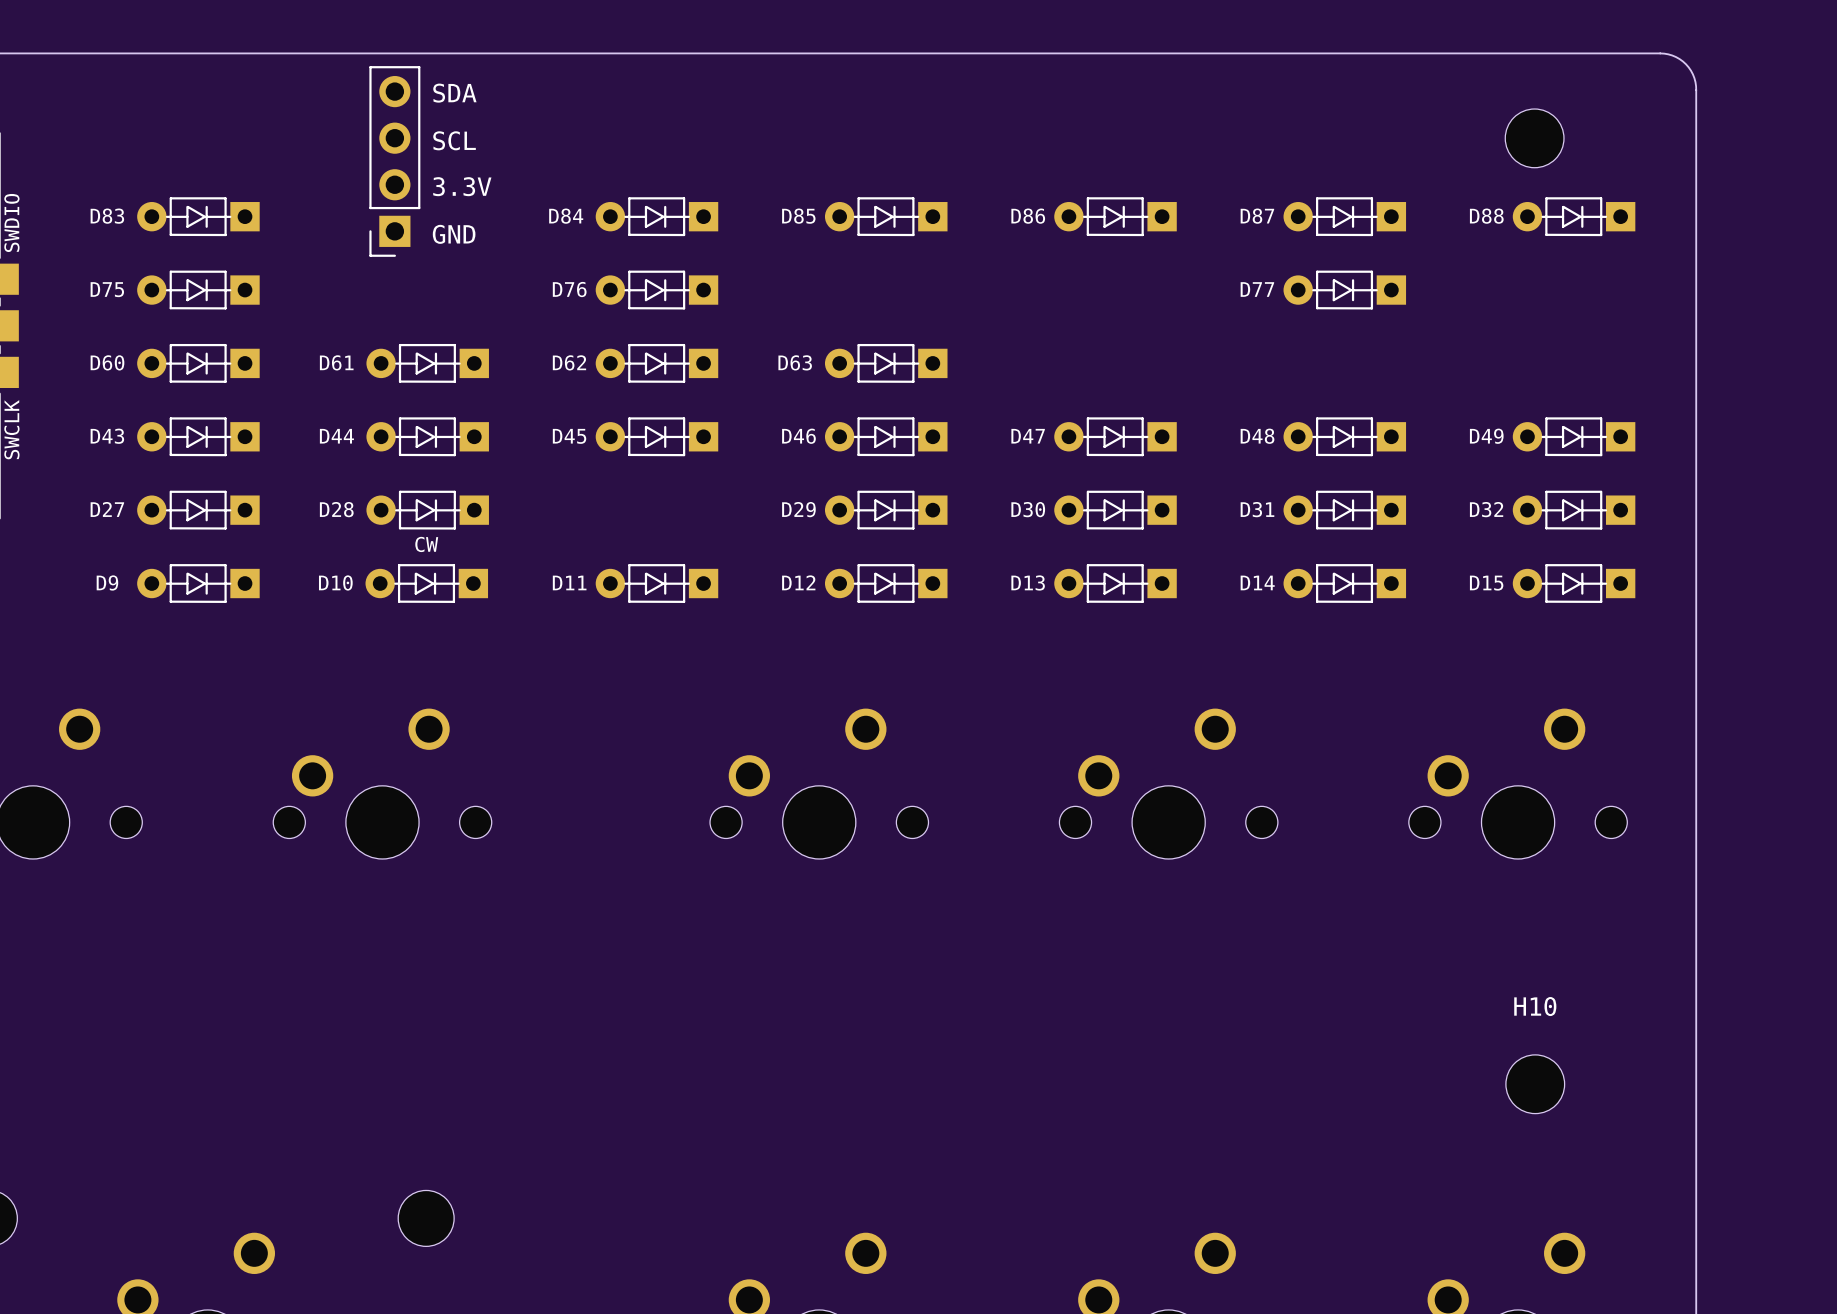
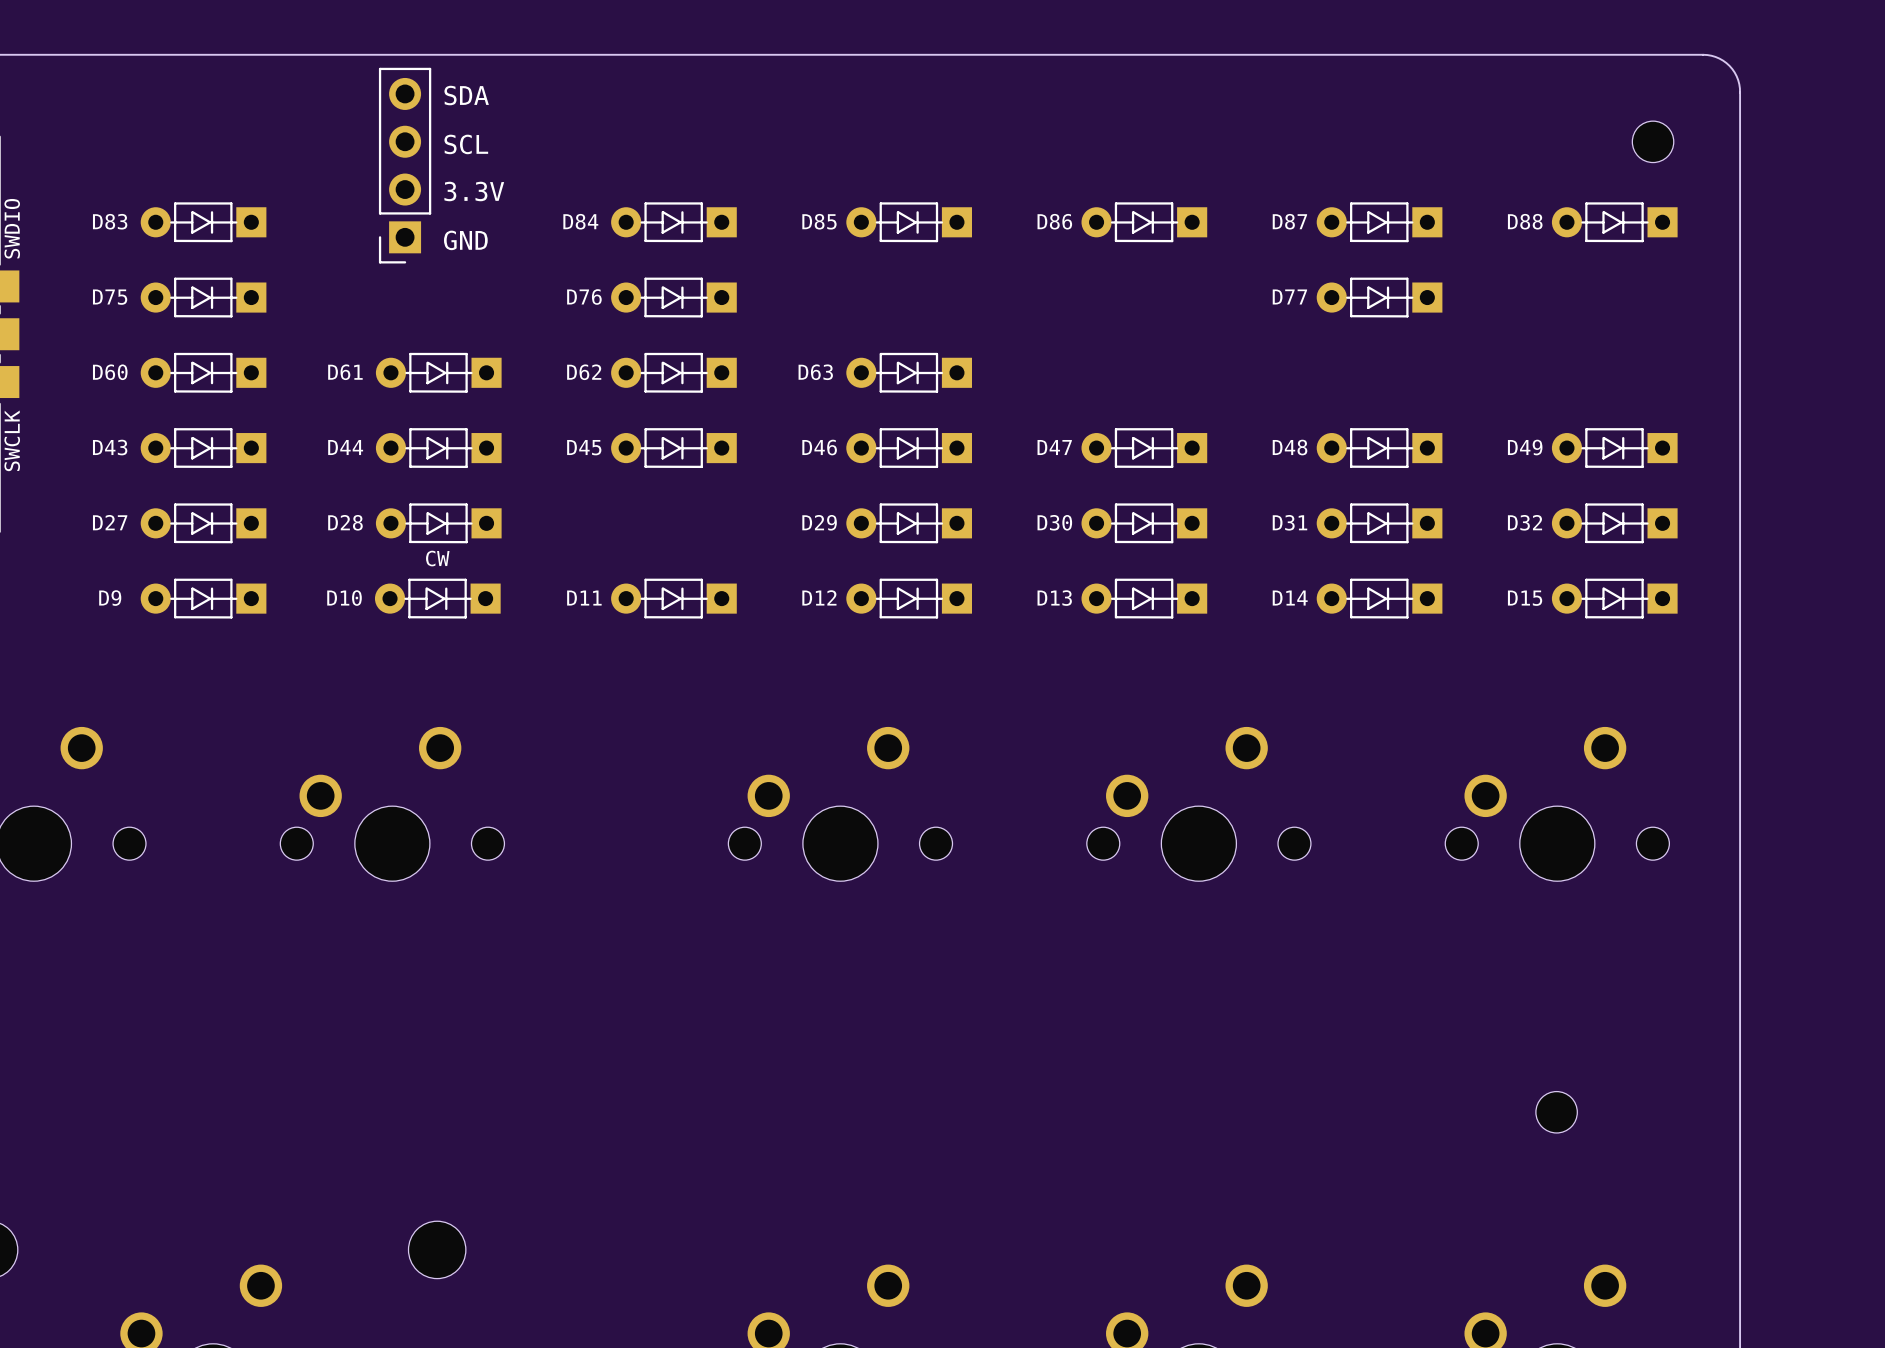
part: (1534, 138) -> none
part: none -> (1653, 141)
part: none -> (1556, 1112)
H10: (1535, 1084) -> none

